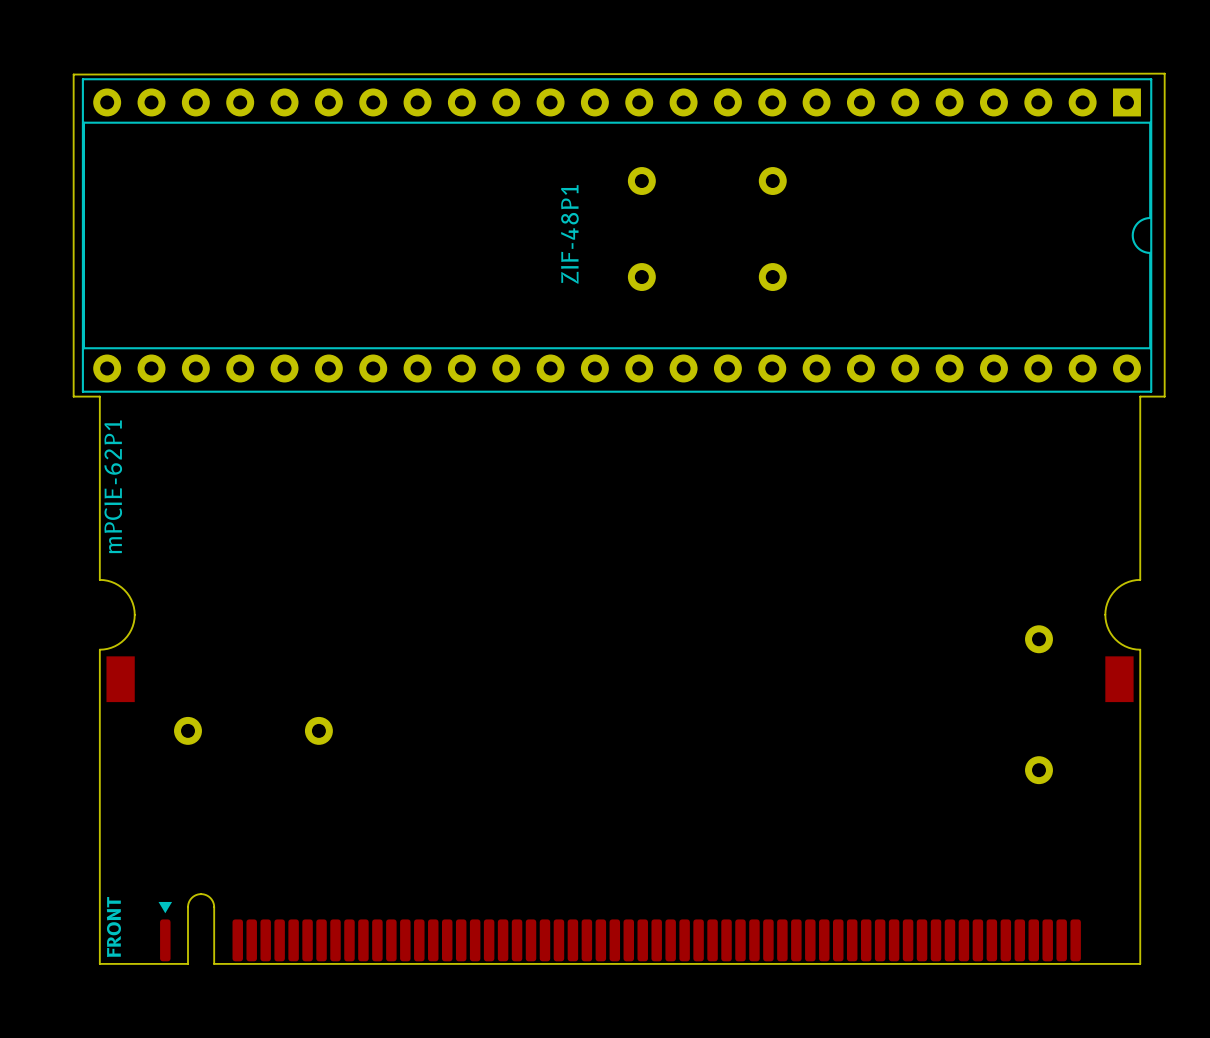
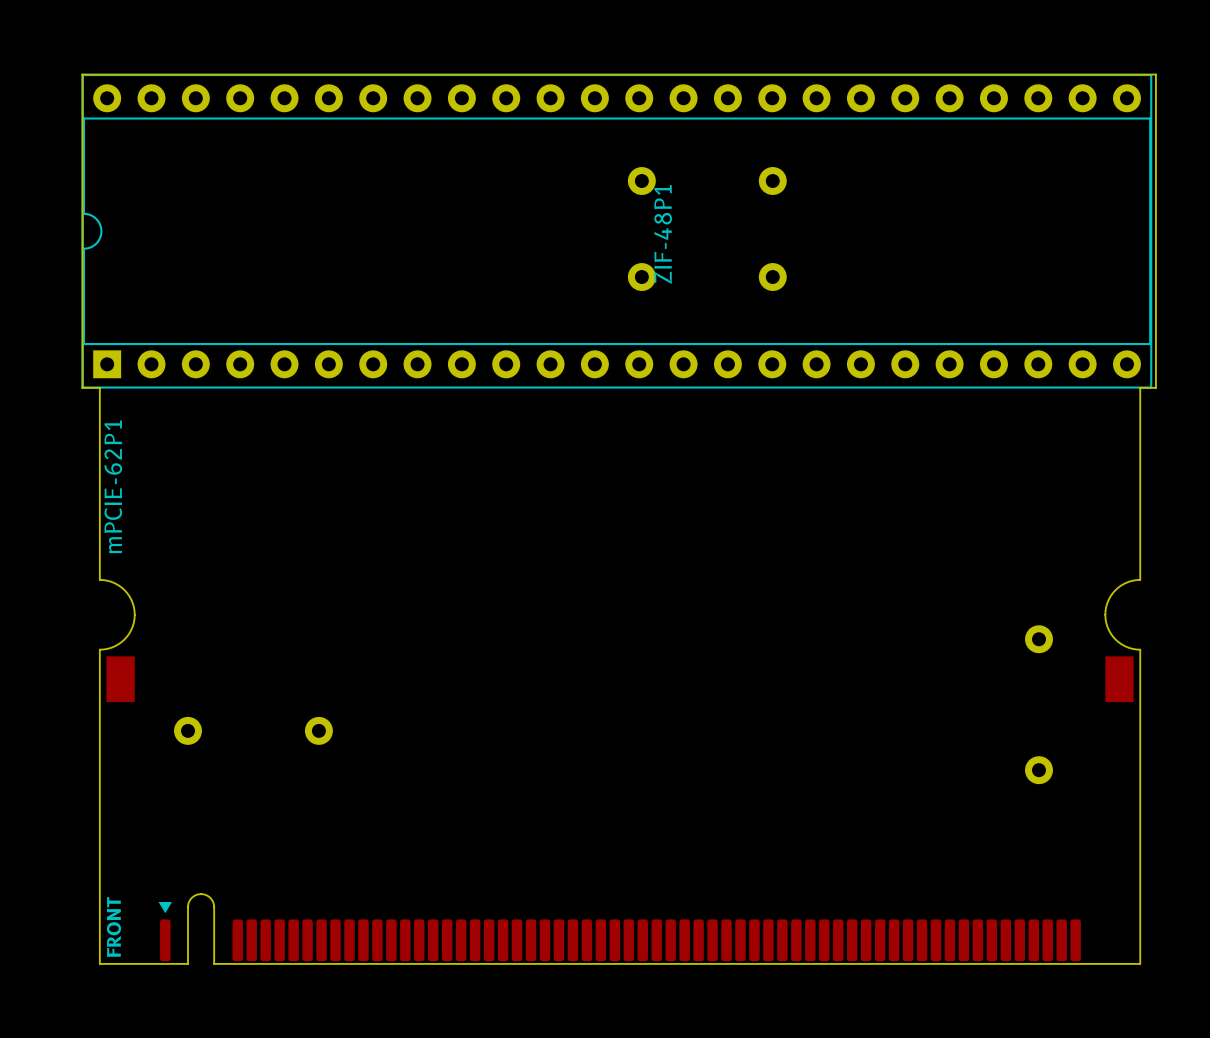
mPCIE-62P1 footprint: [72, 72, 1166, 965] -> [81, 73, 1157, 965]
ZIF-48P1 rotation: 0° (617, 235) -> 180° (617, 231)

